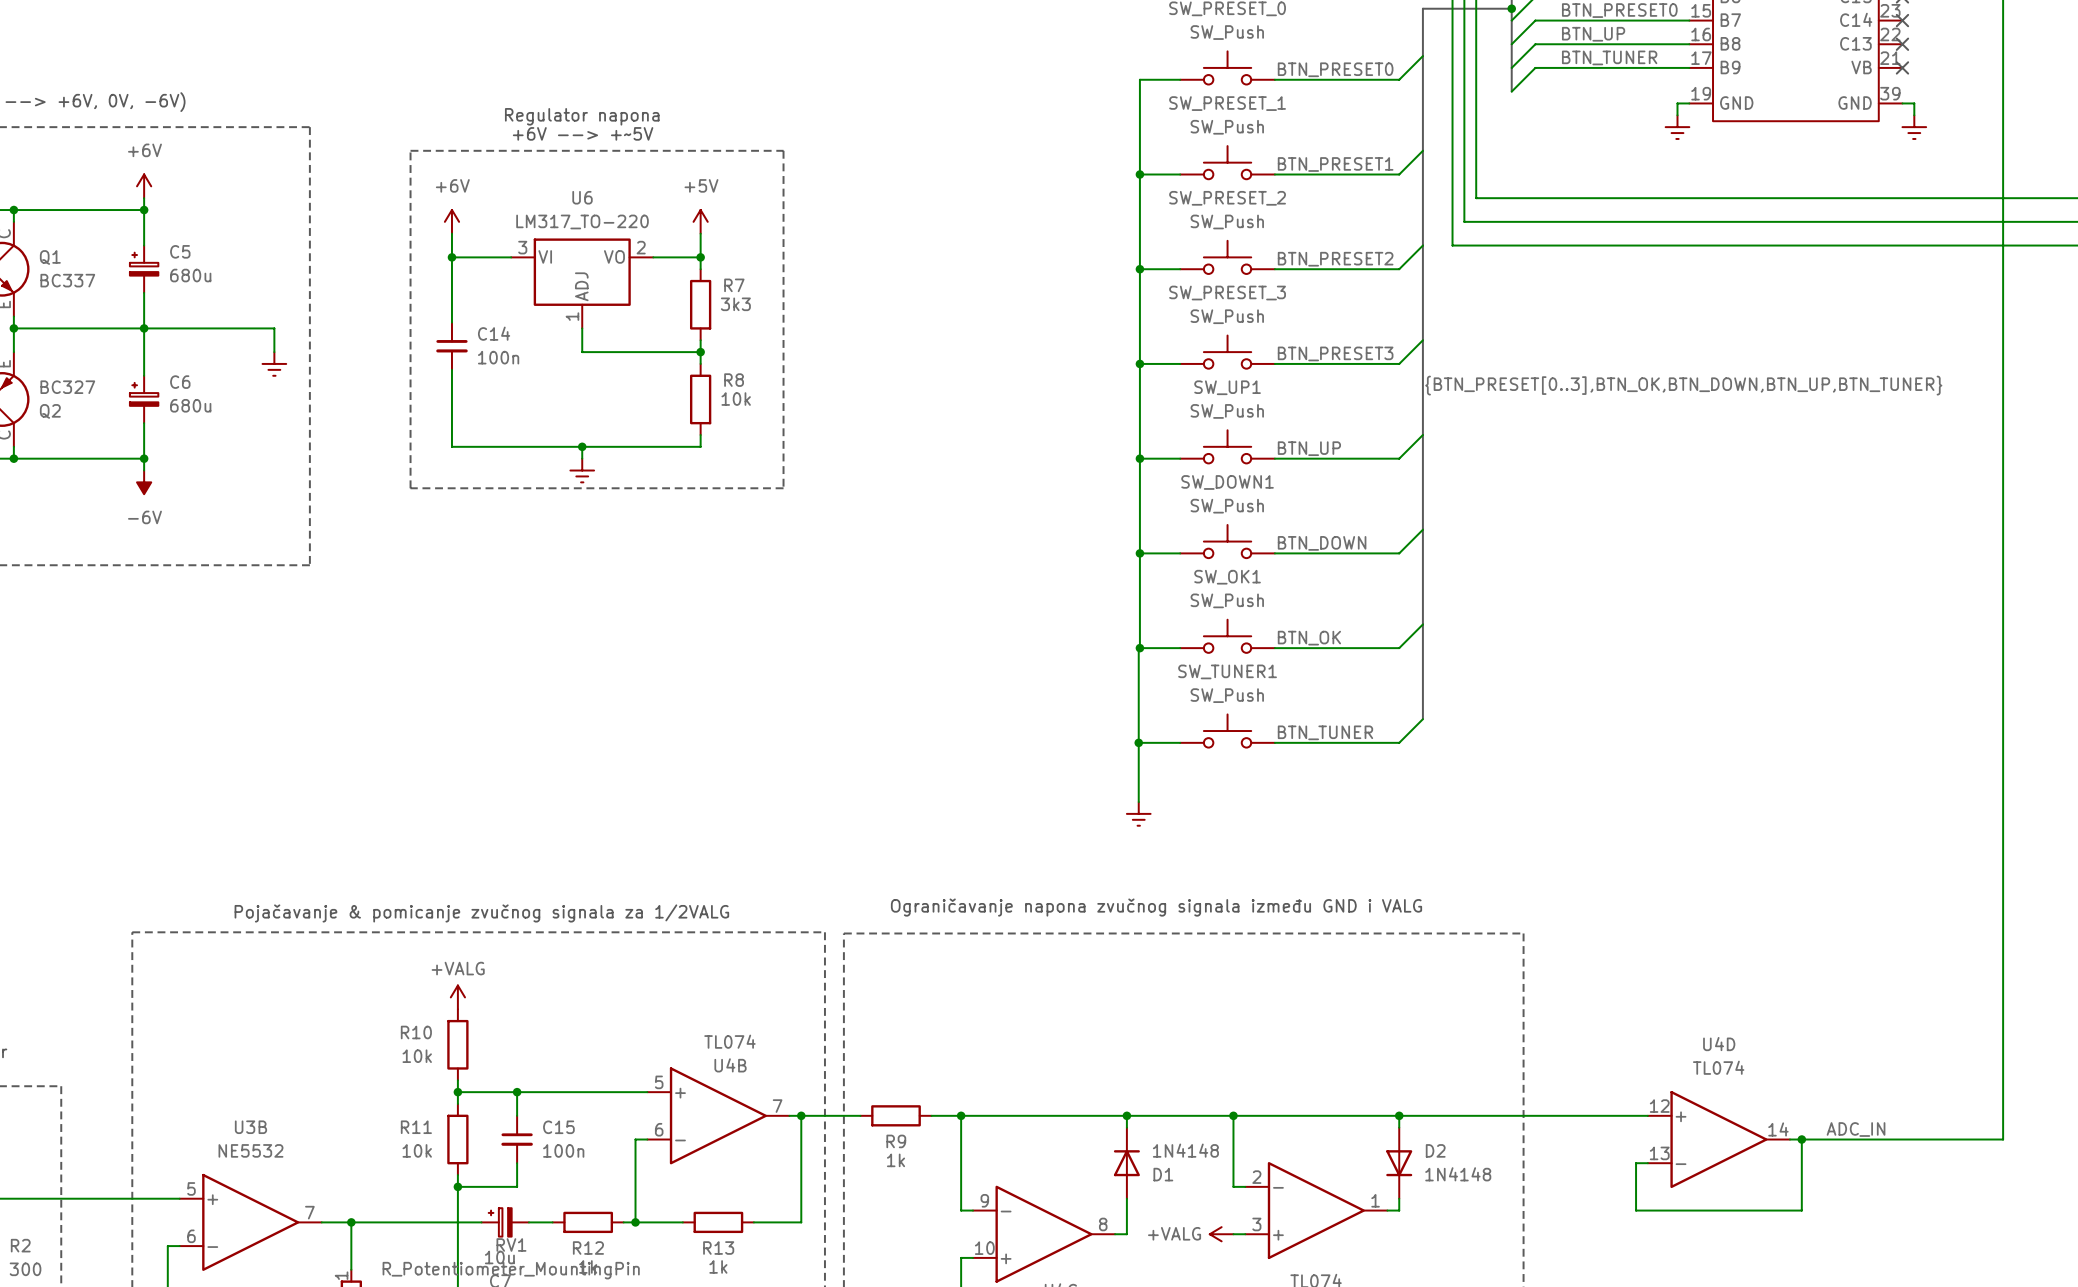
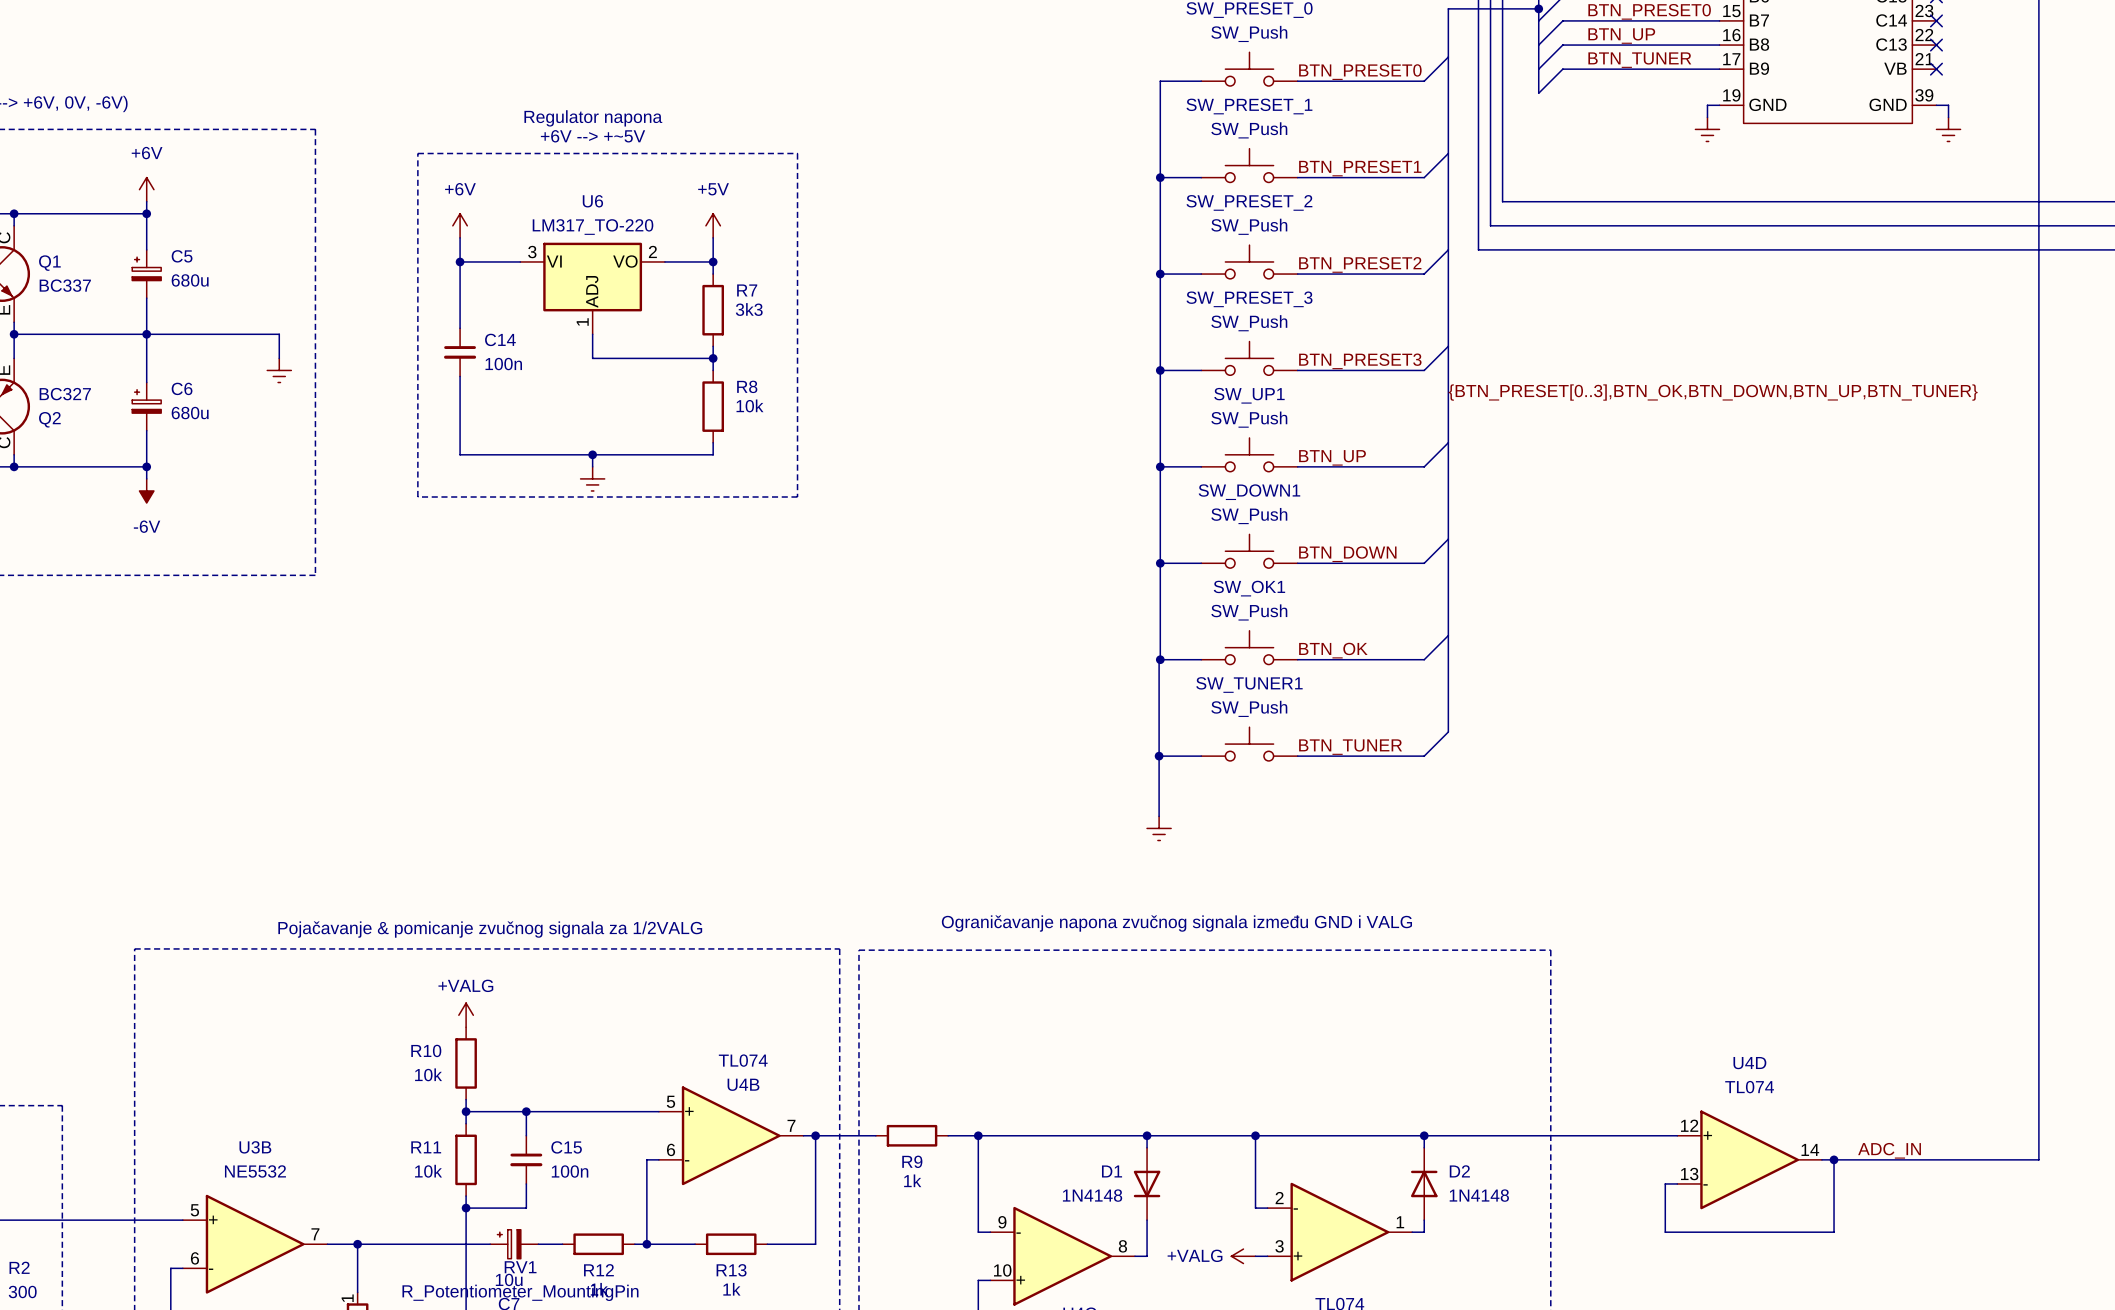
D1 rotation: 0° (1126, 1163) -> 180° (1147, 1183)
D2 rotation: 0° (1399, 1163) -> 180° (1424, 1183)

